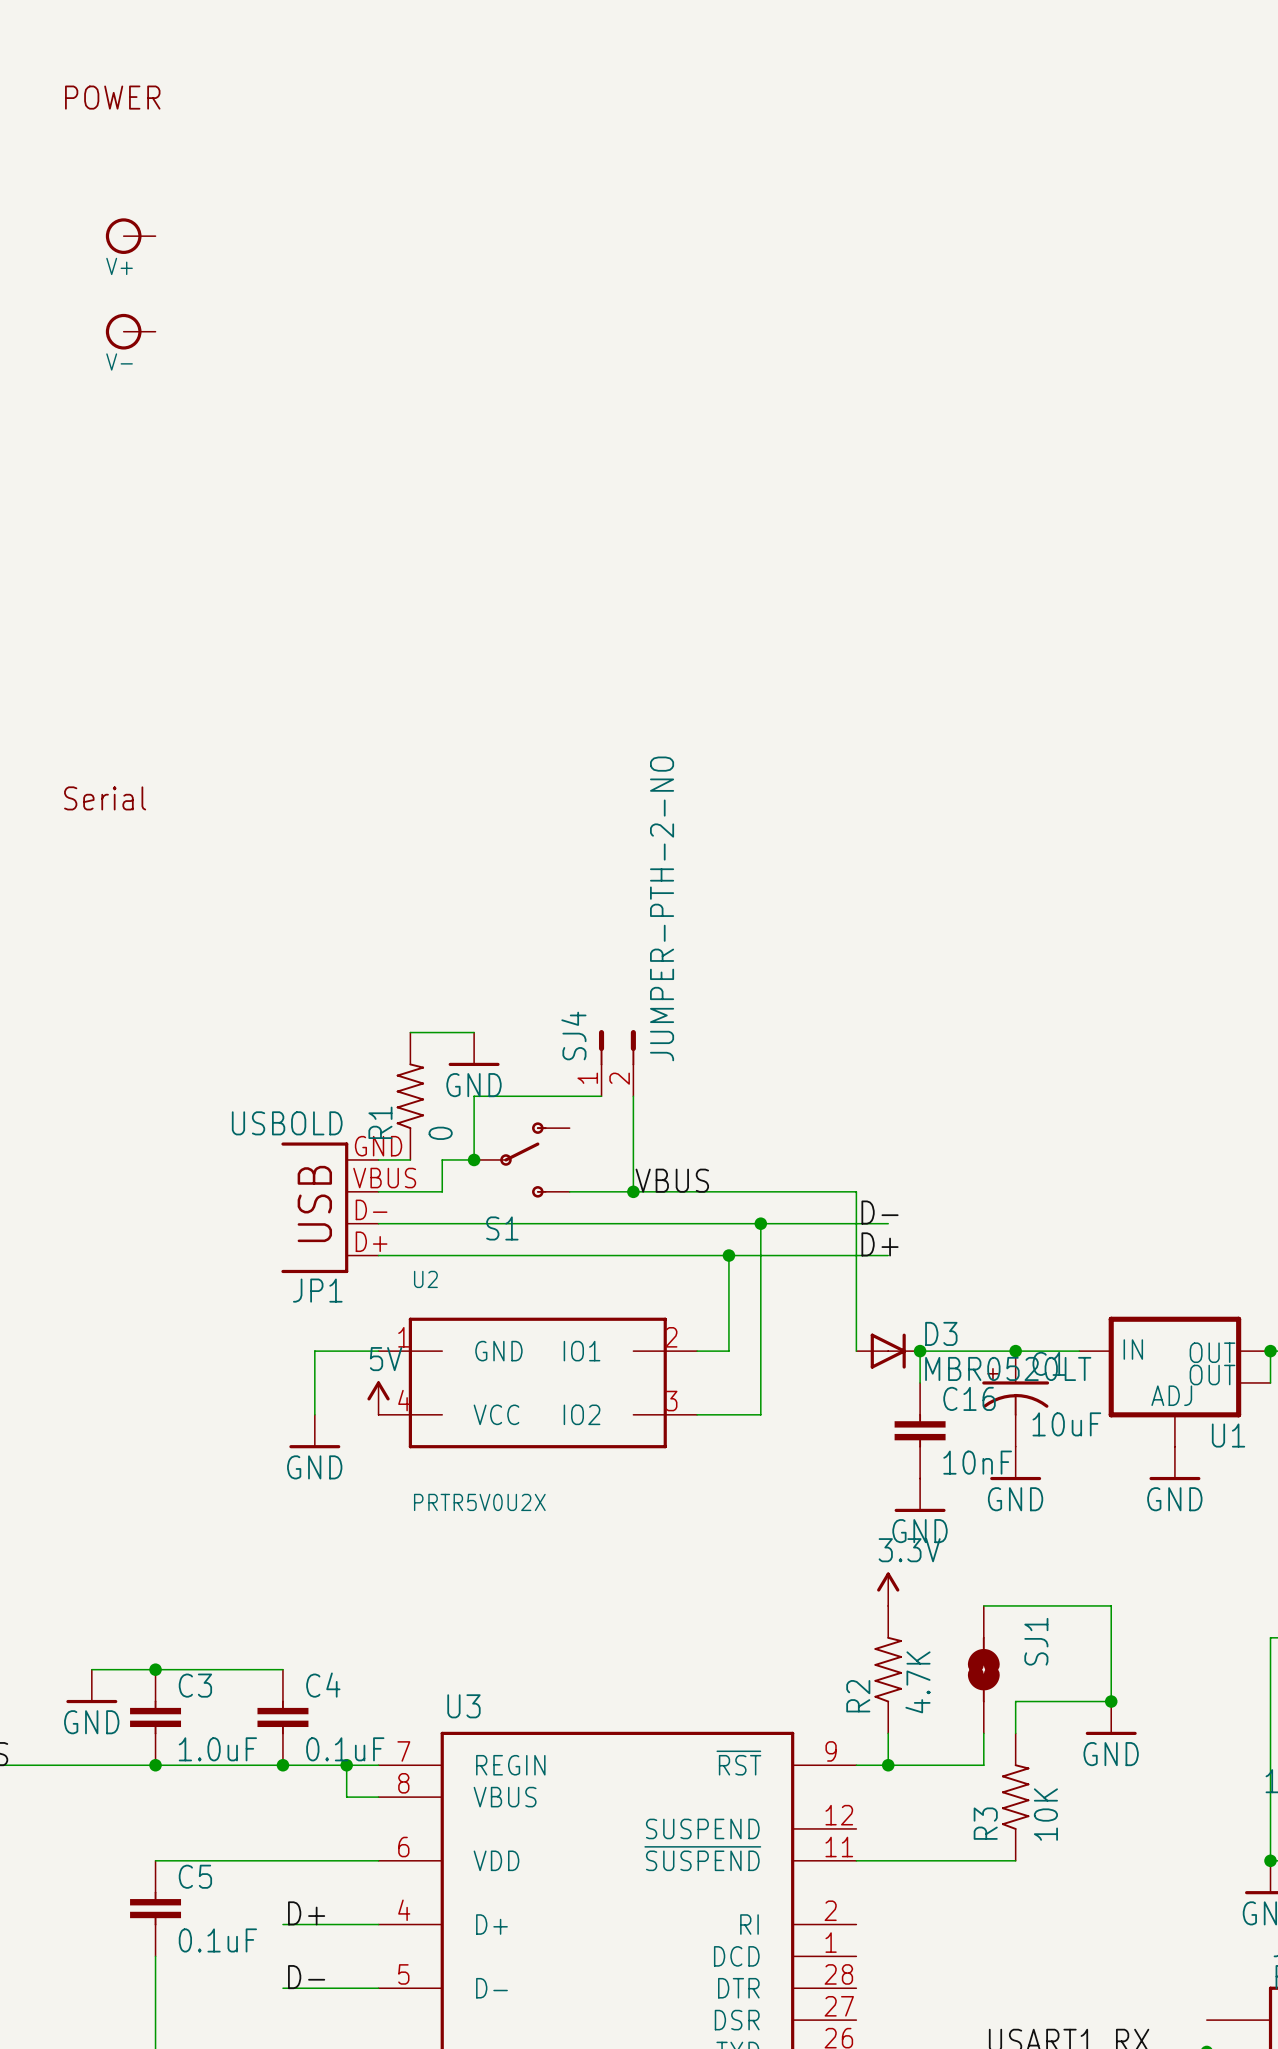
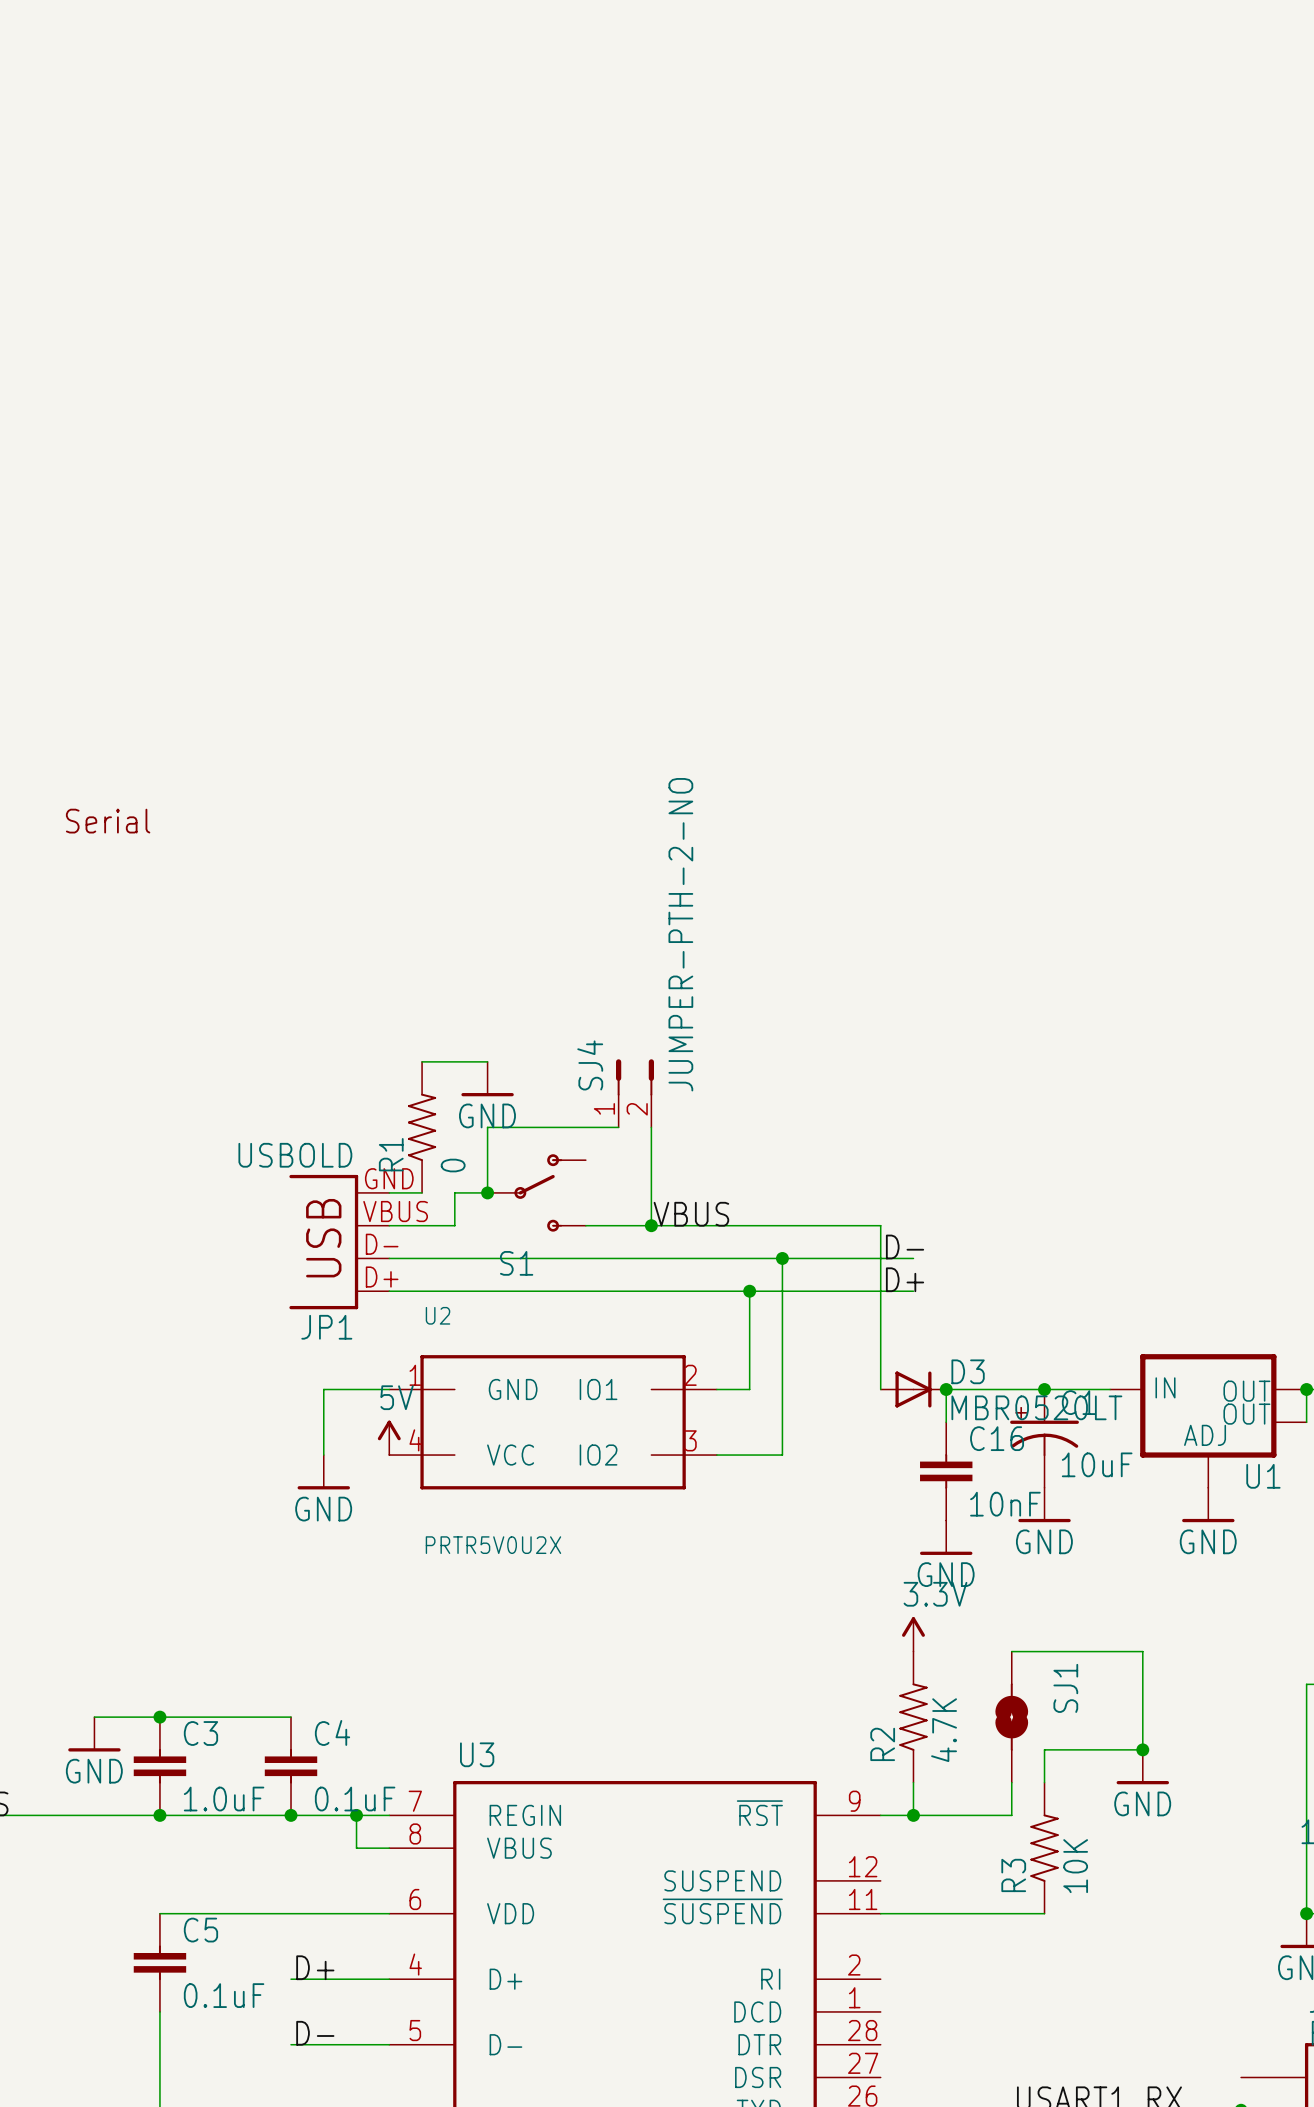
text: POWER (112, 97) -> none
V+: (130, 236) -> none
V-: (130, 331) -> none

